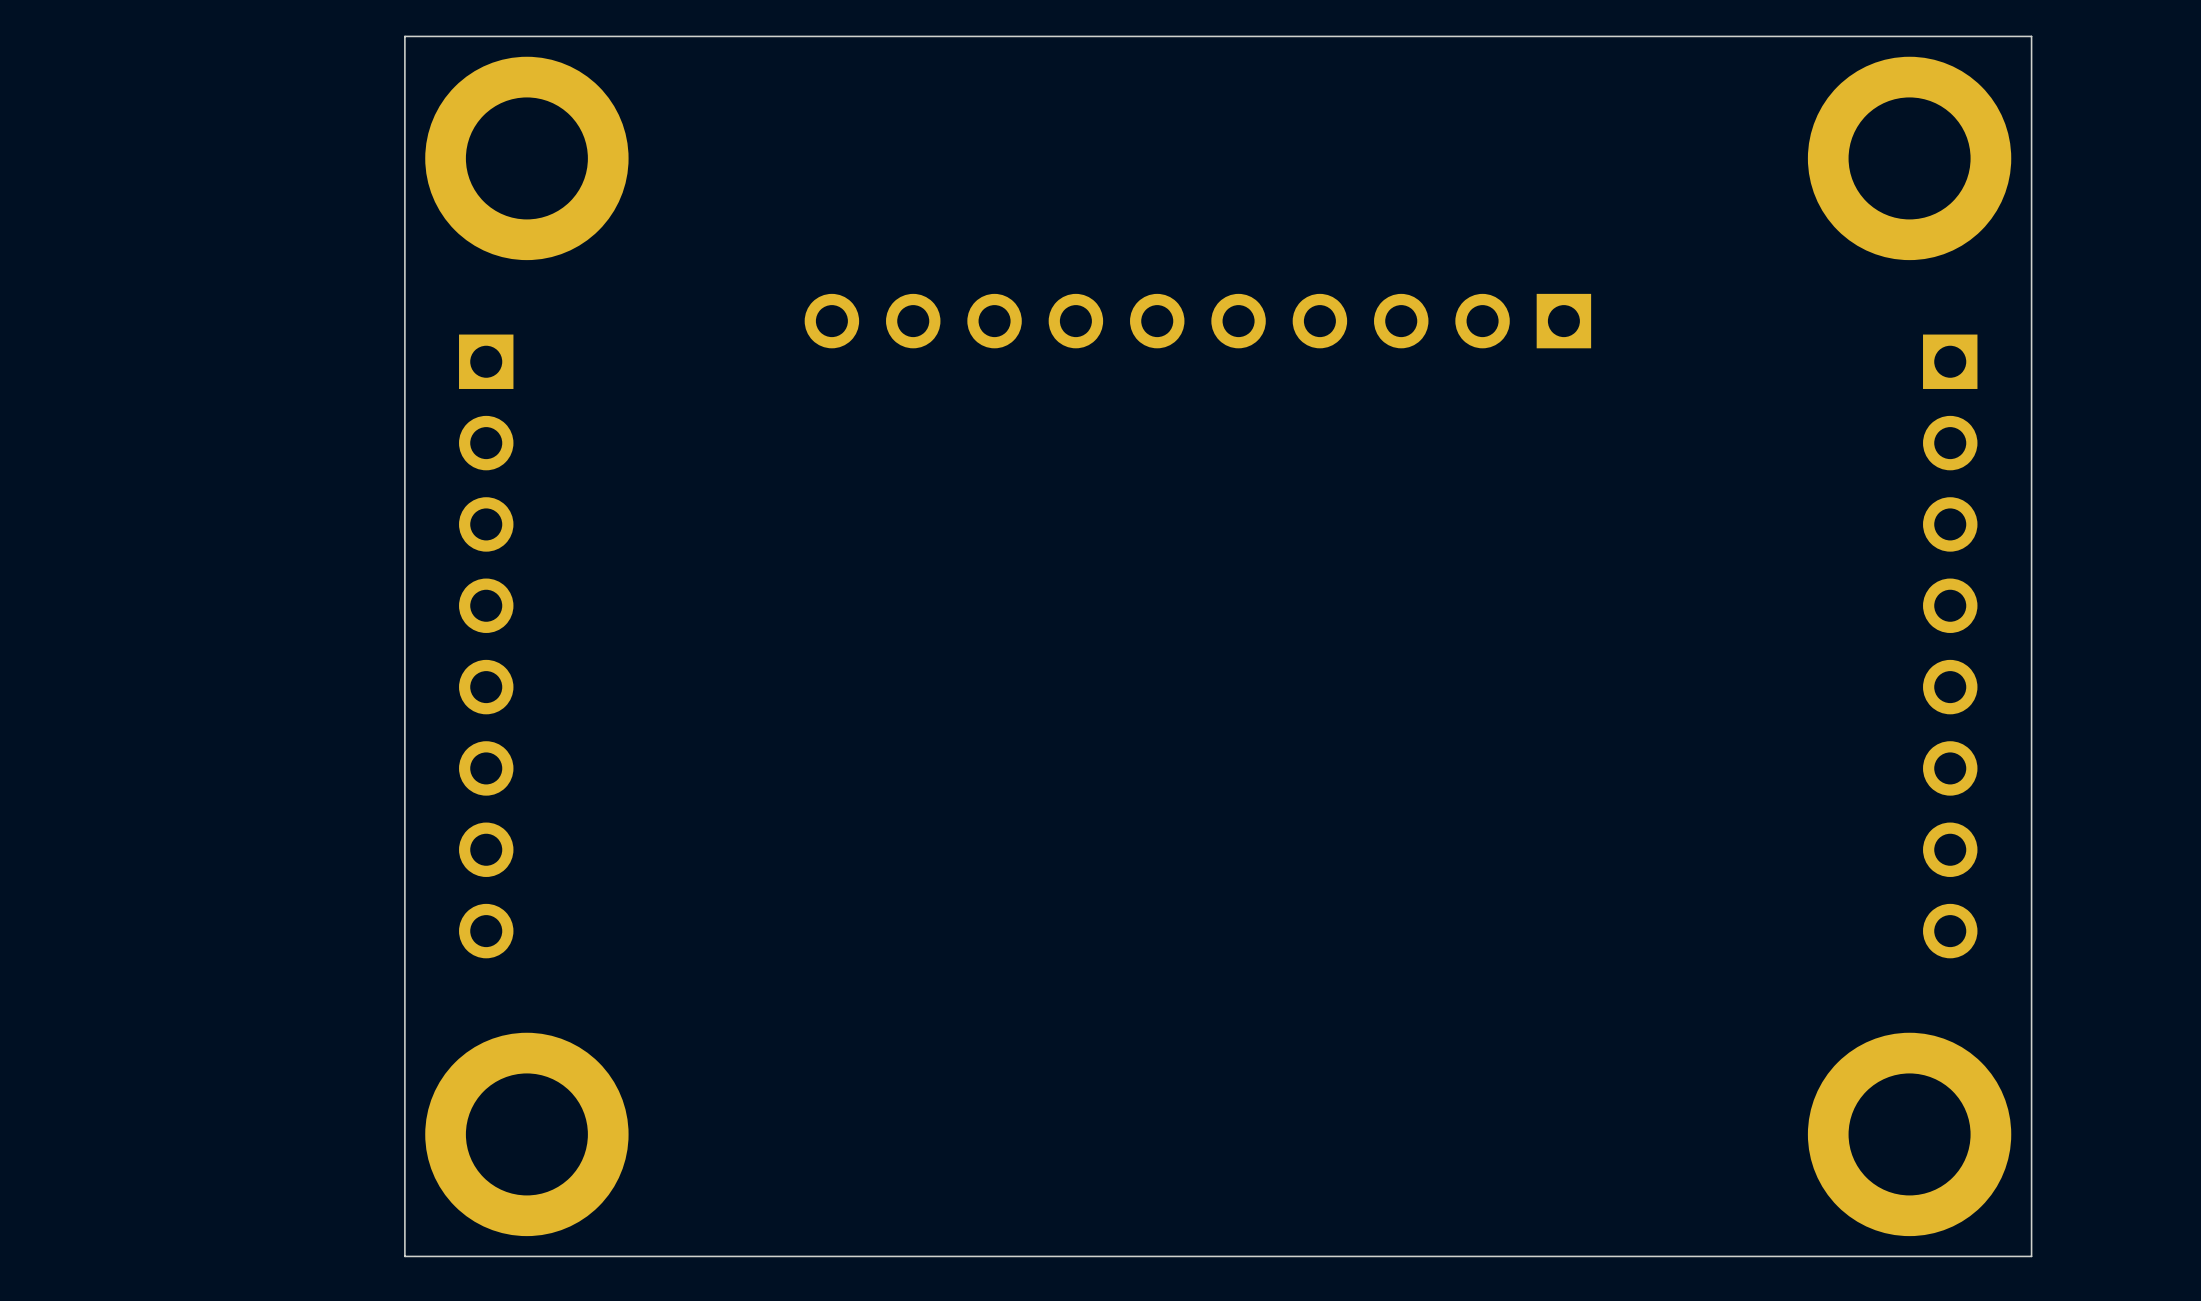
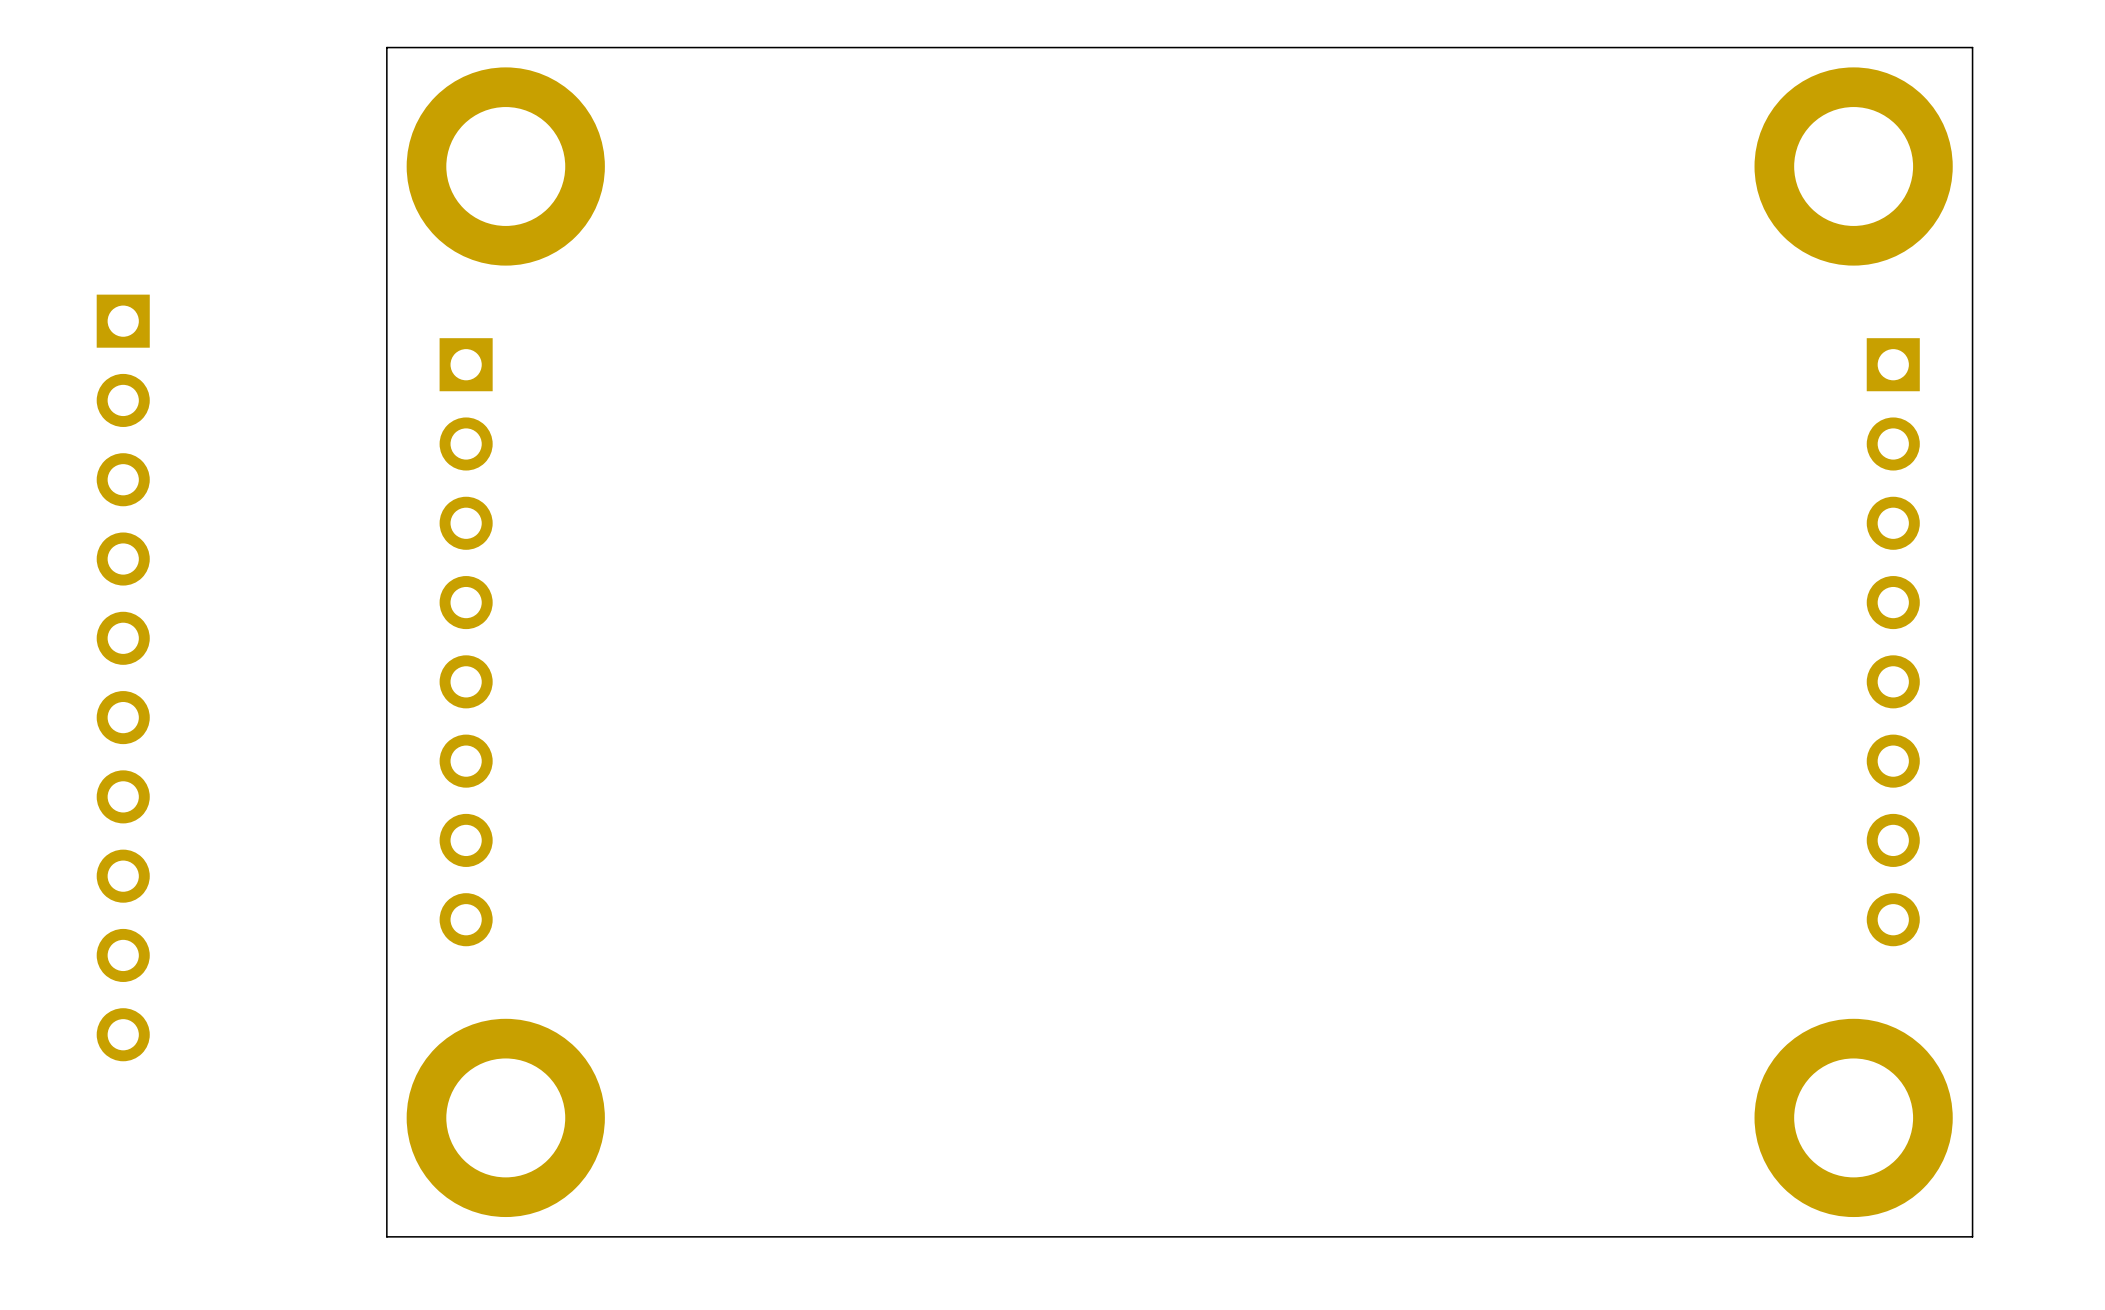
part: (1197, 321) -> none
part: none -> (123, 677)

